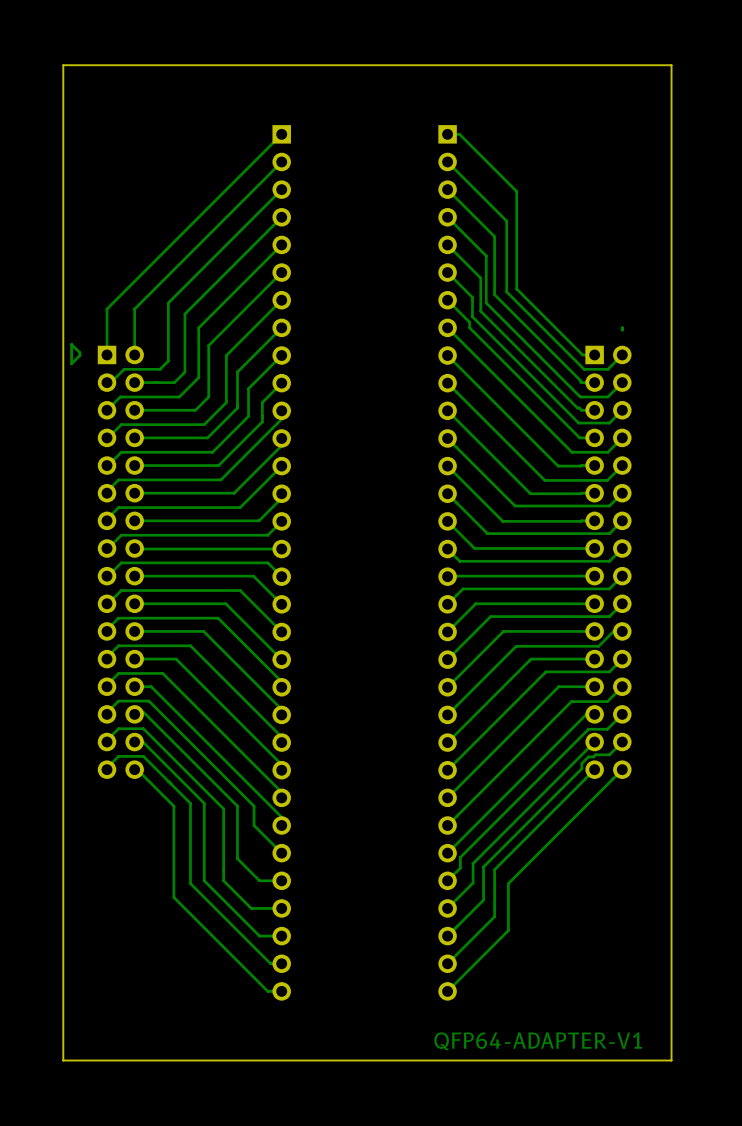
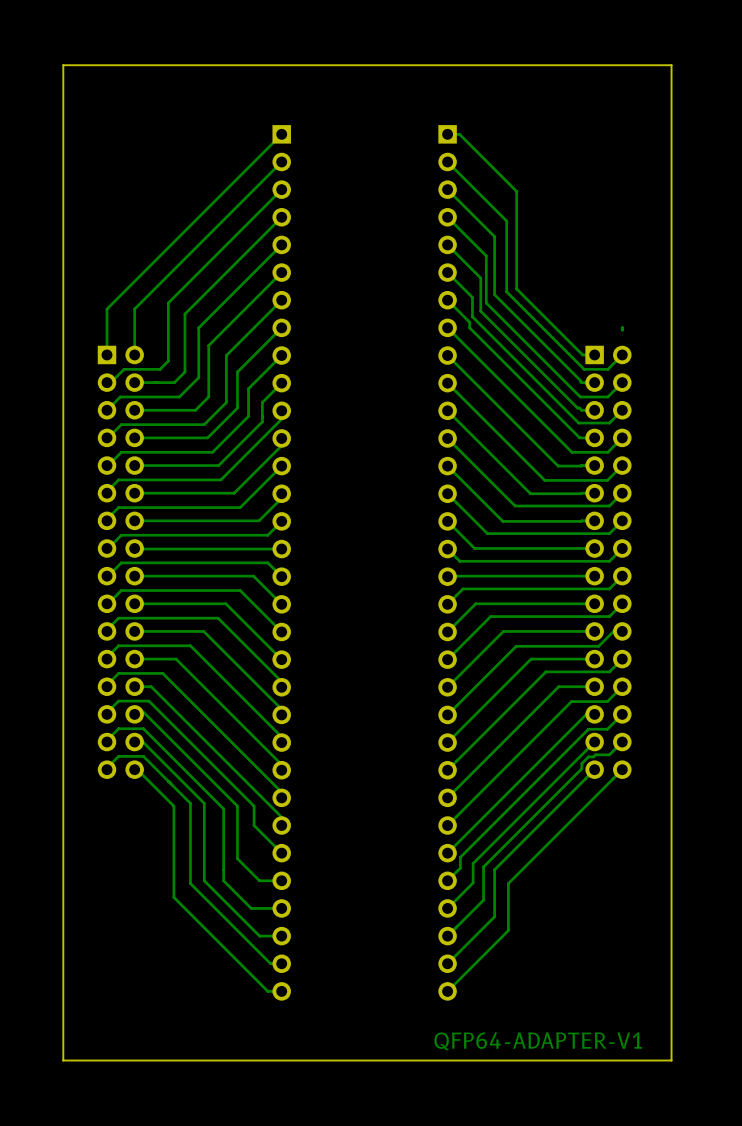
bottom track: (71, 344) (79, 352) (79, 355) (71, 363) (71, 344) -> none

